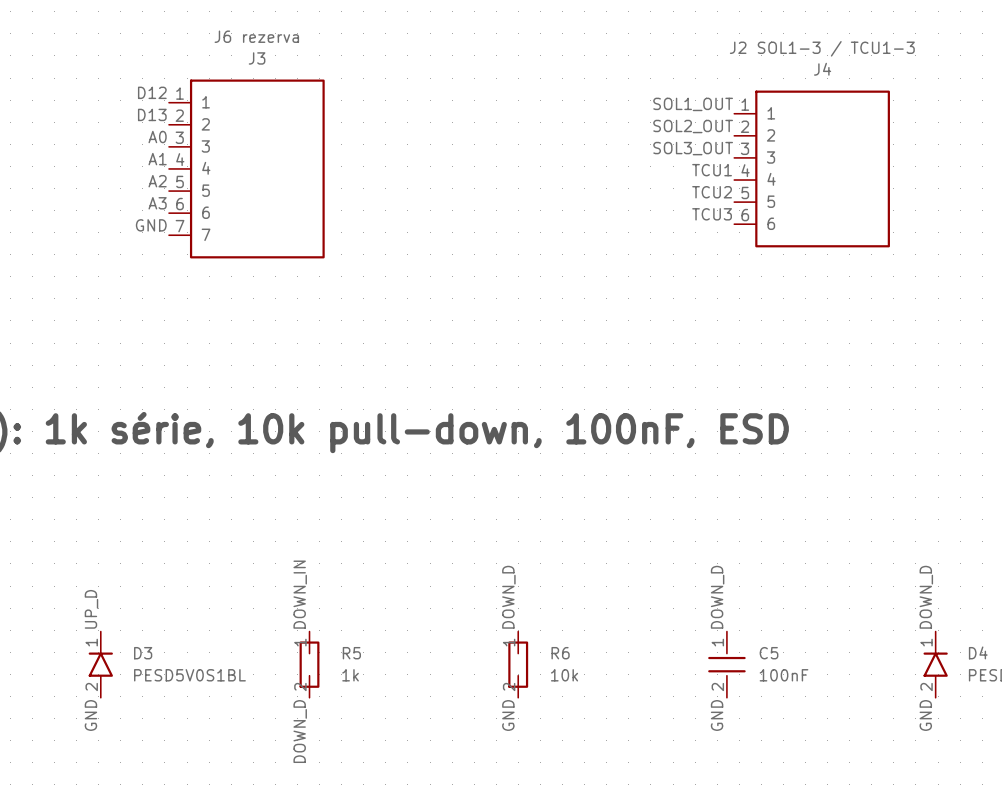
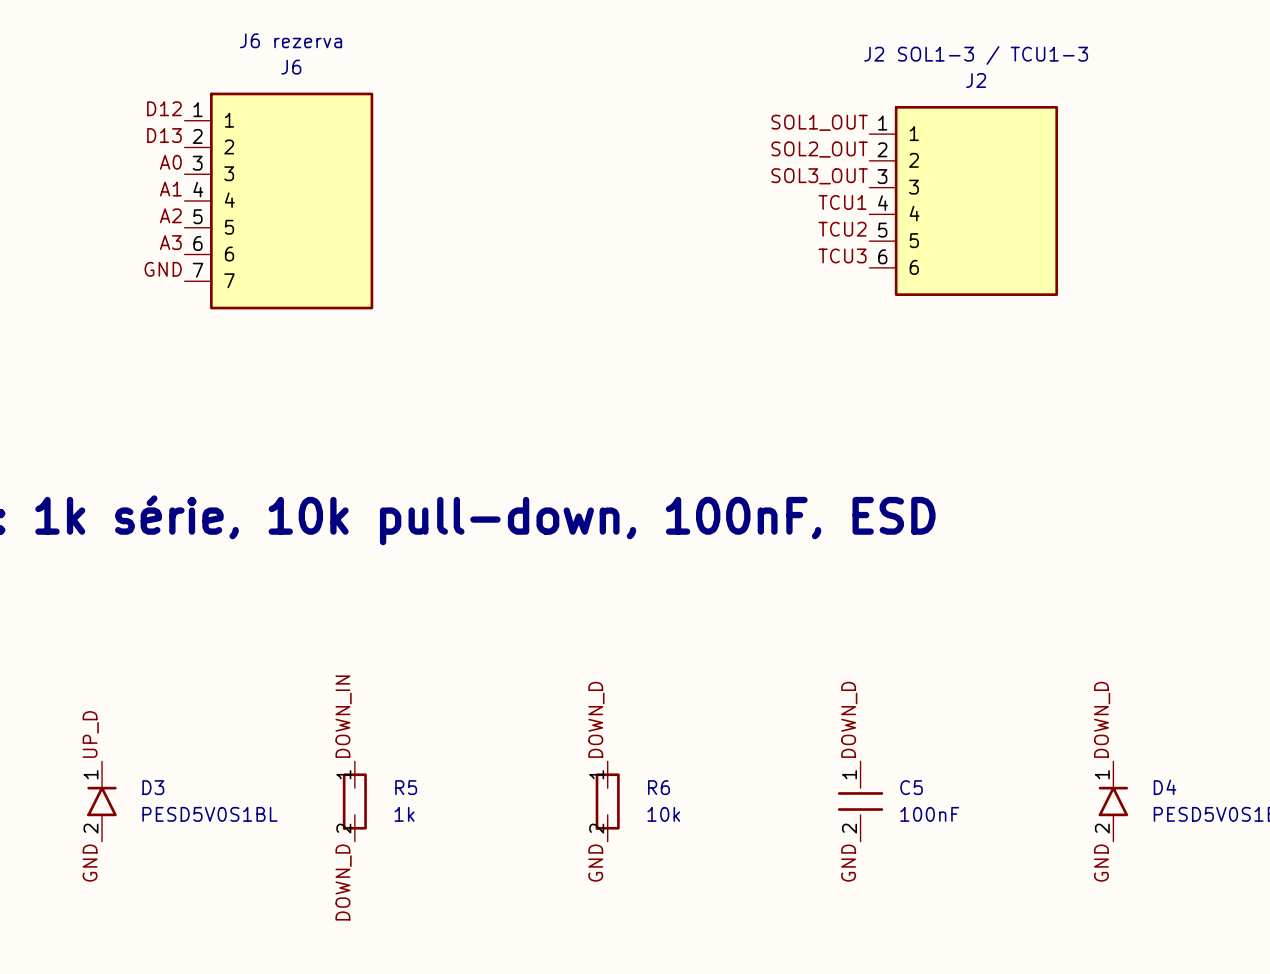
J3 name: J3 (257, 58) -> J6 (291, 67)
J4 name: J4 (822, 69) -> J2 (976, 80)

